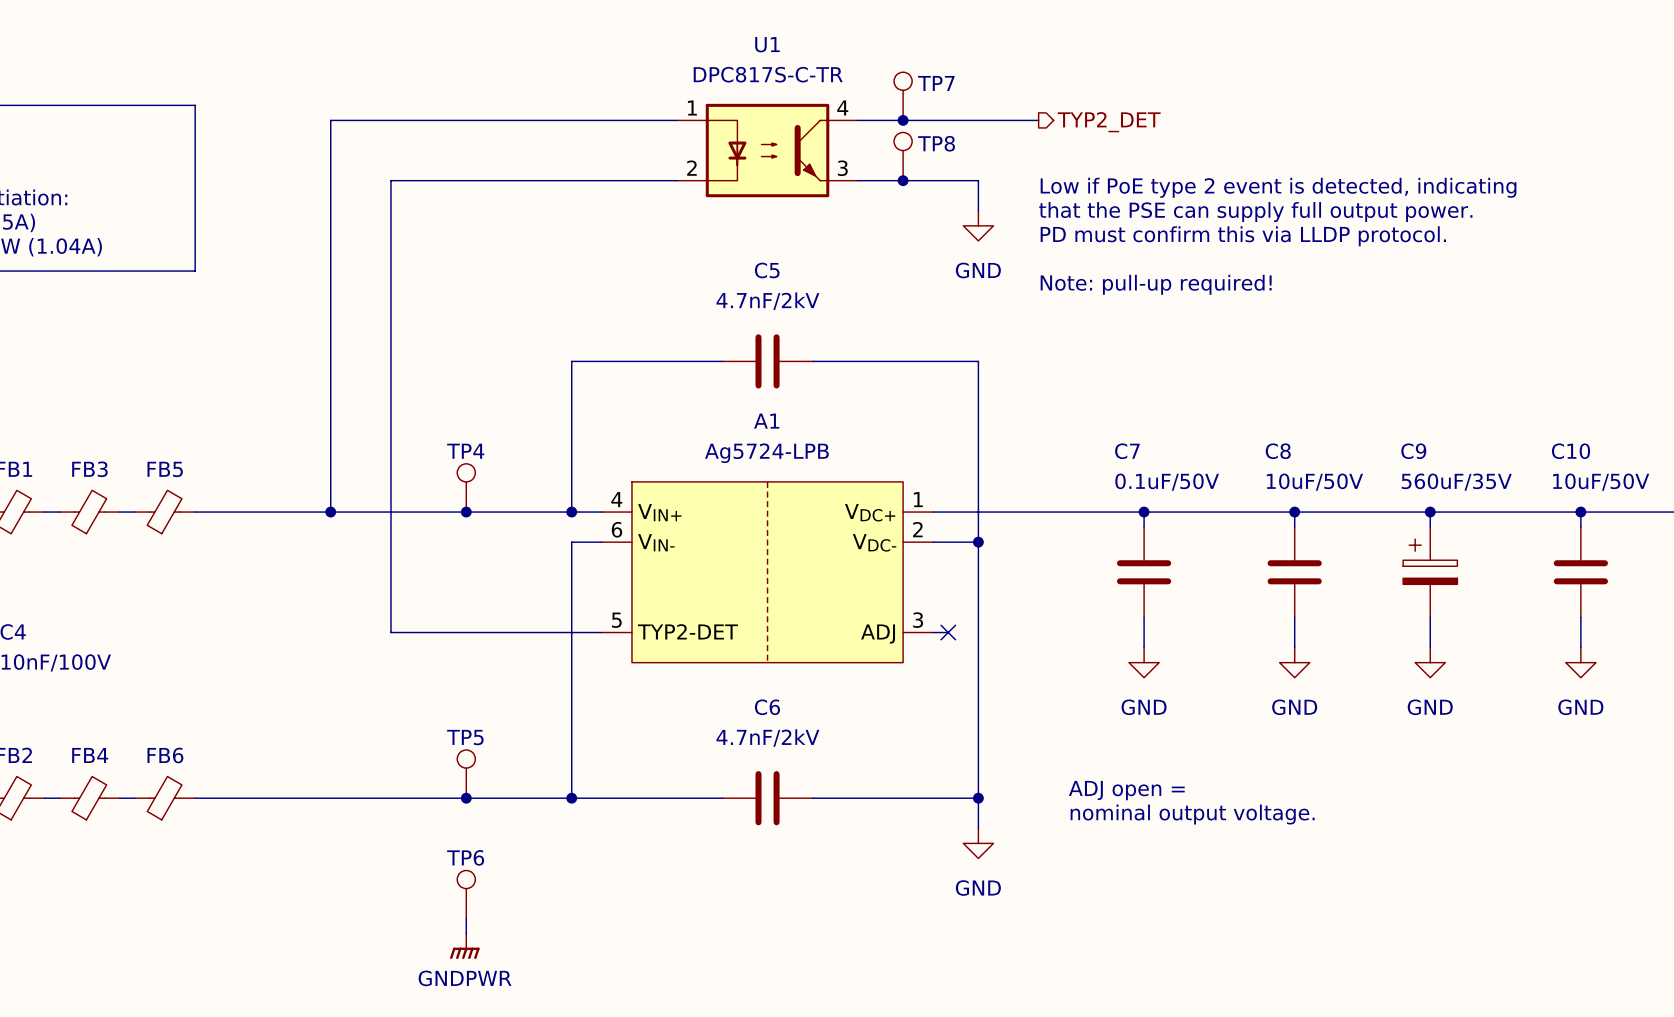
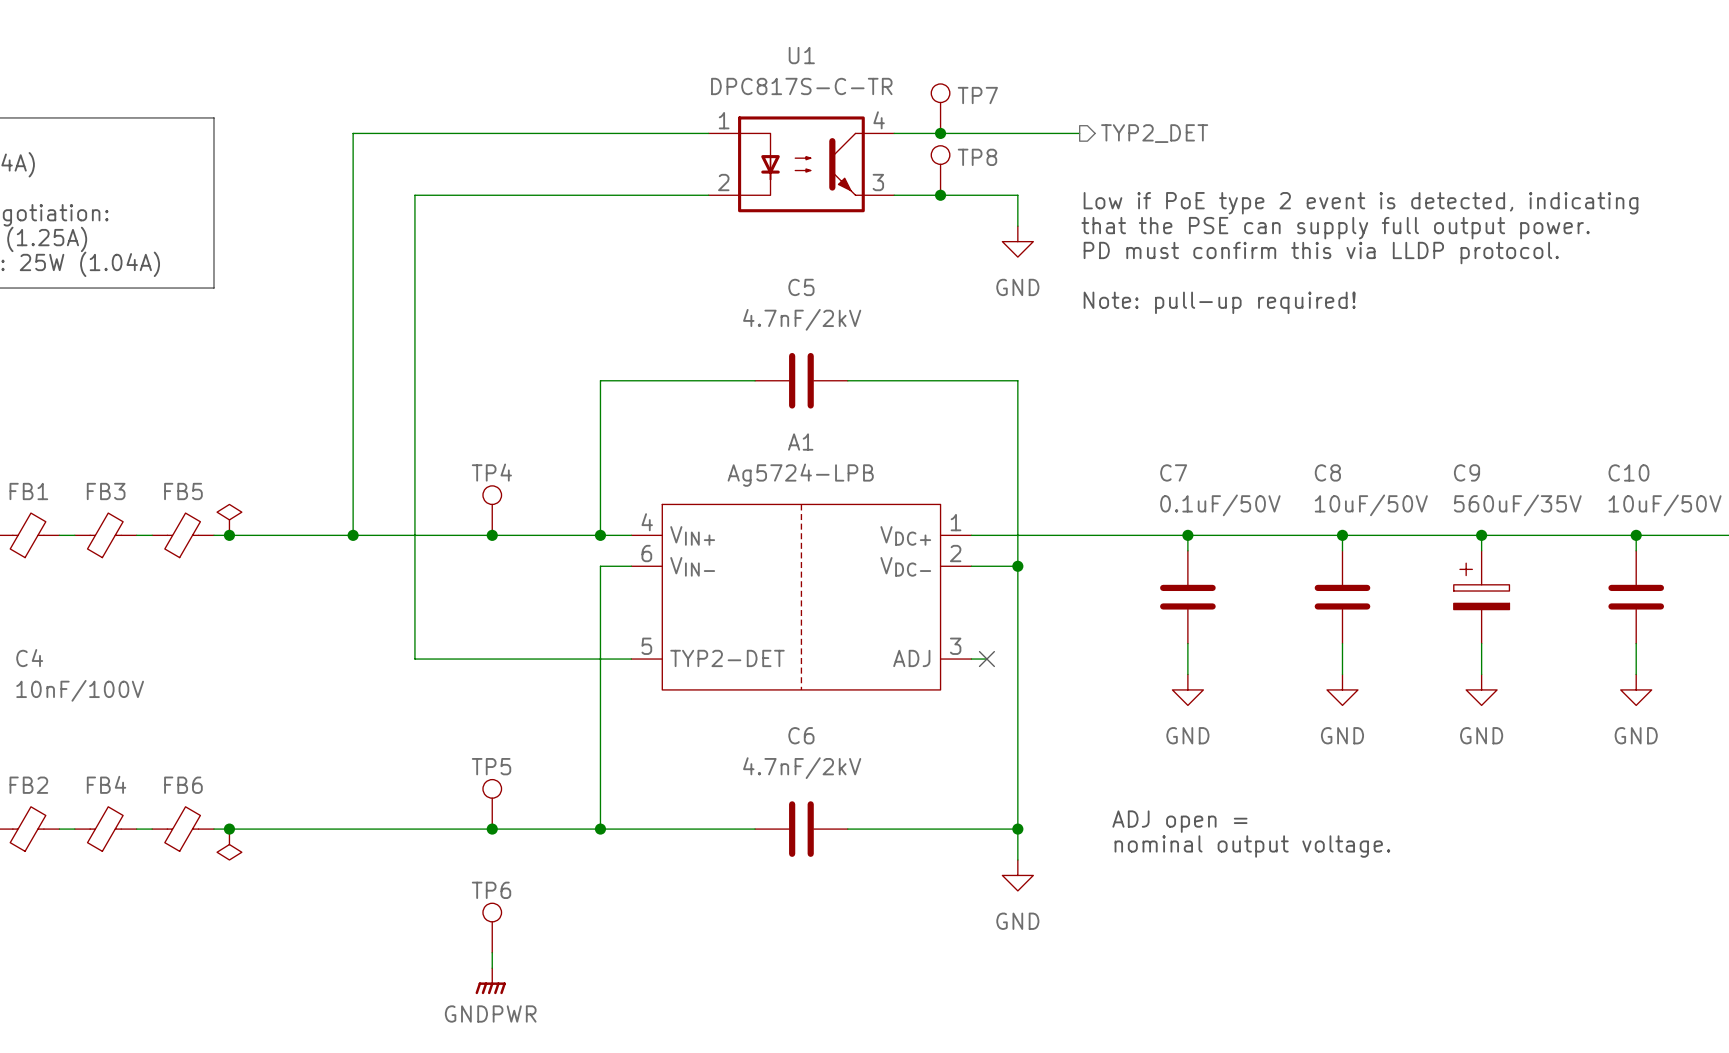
power symbol: none -> (229, 519)
junction: none -> (229, 535)
junction: none -> (229, 829)
power symbol: none -> (229, 844)

